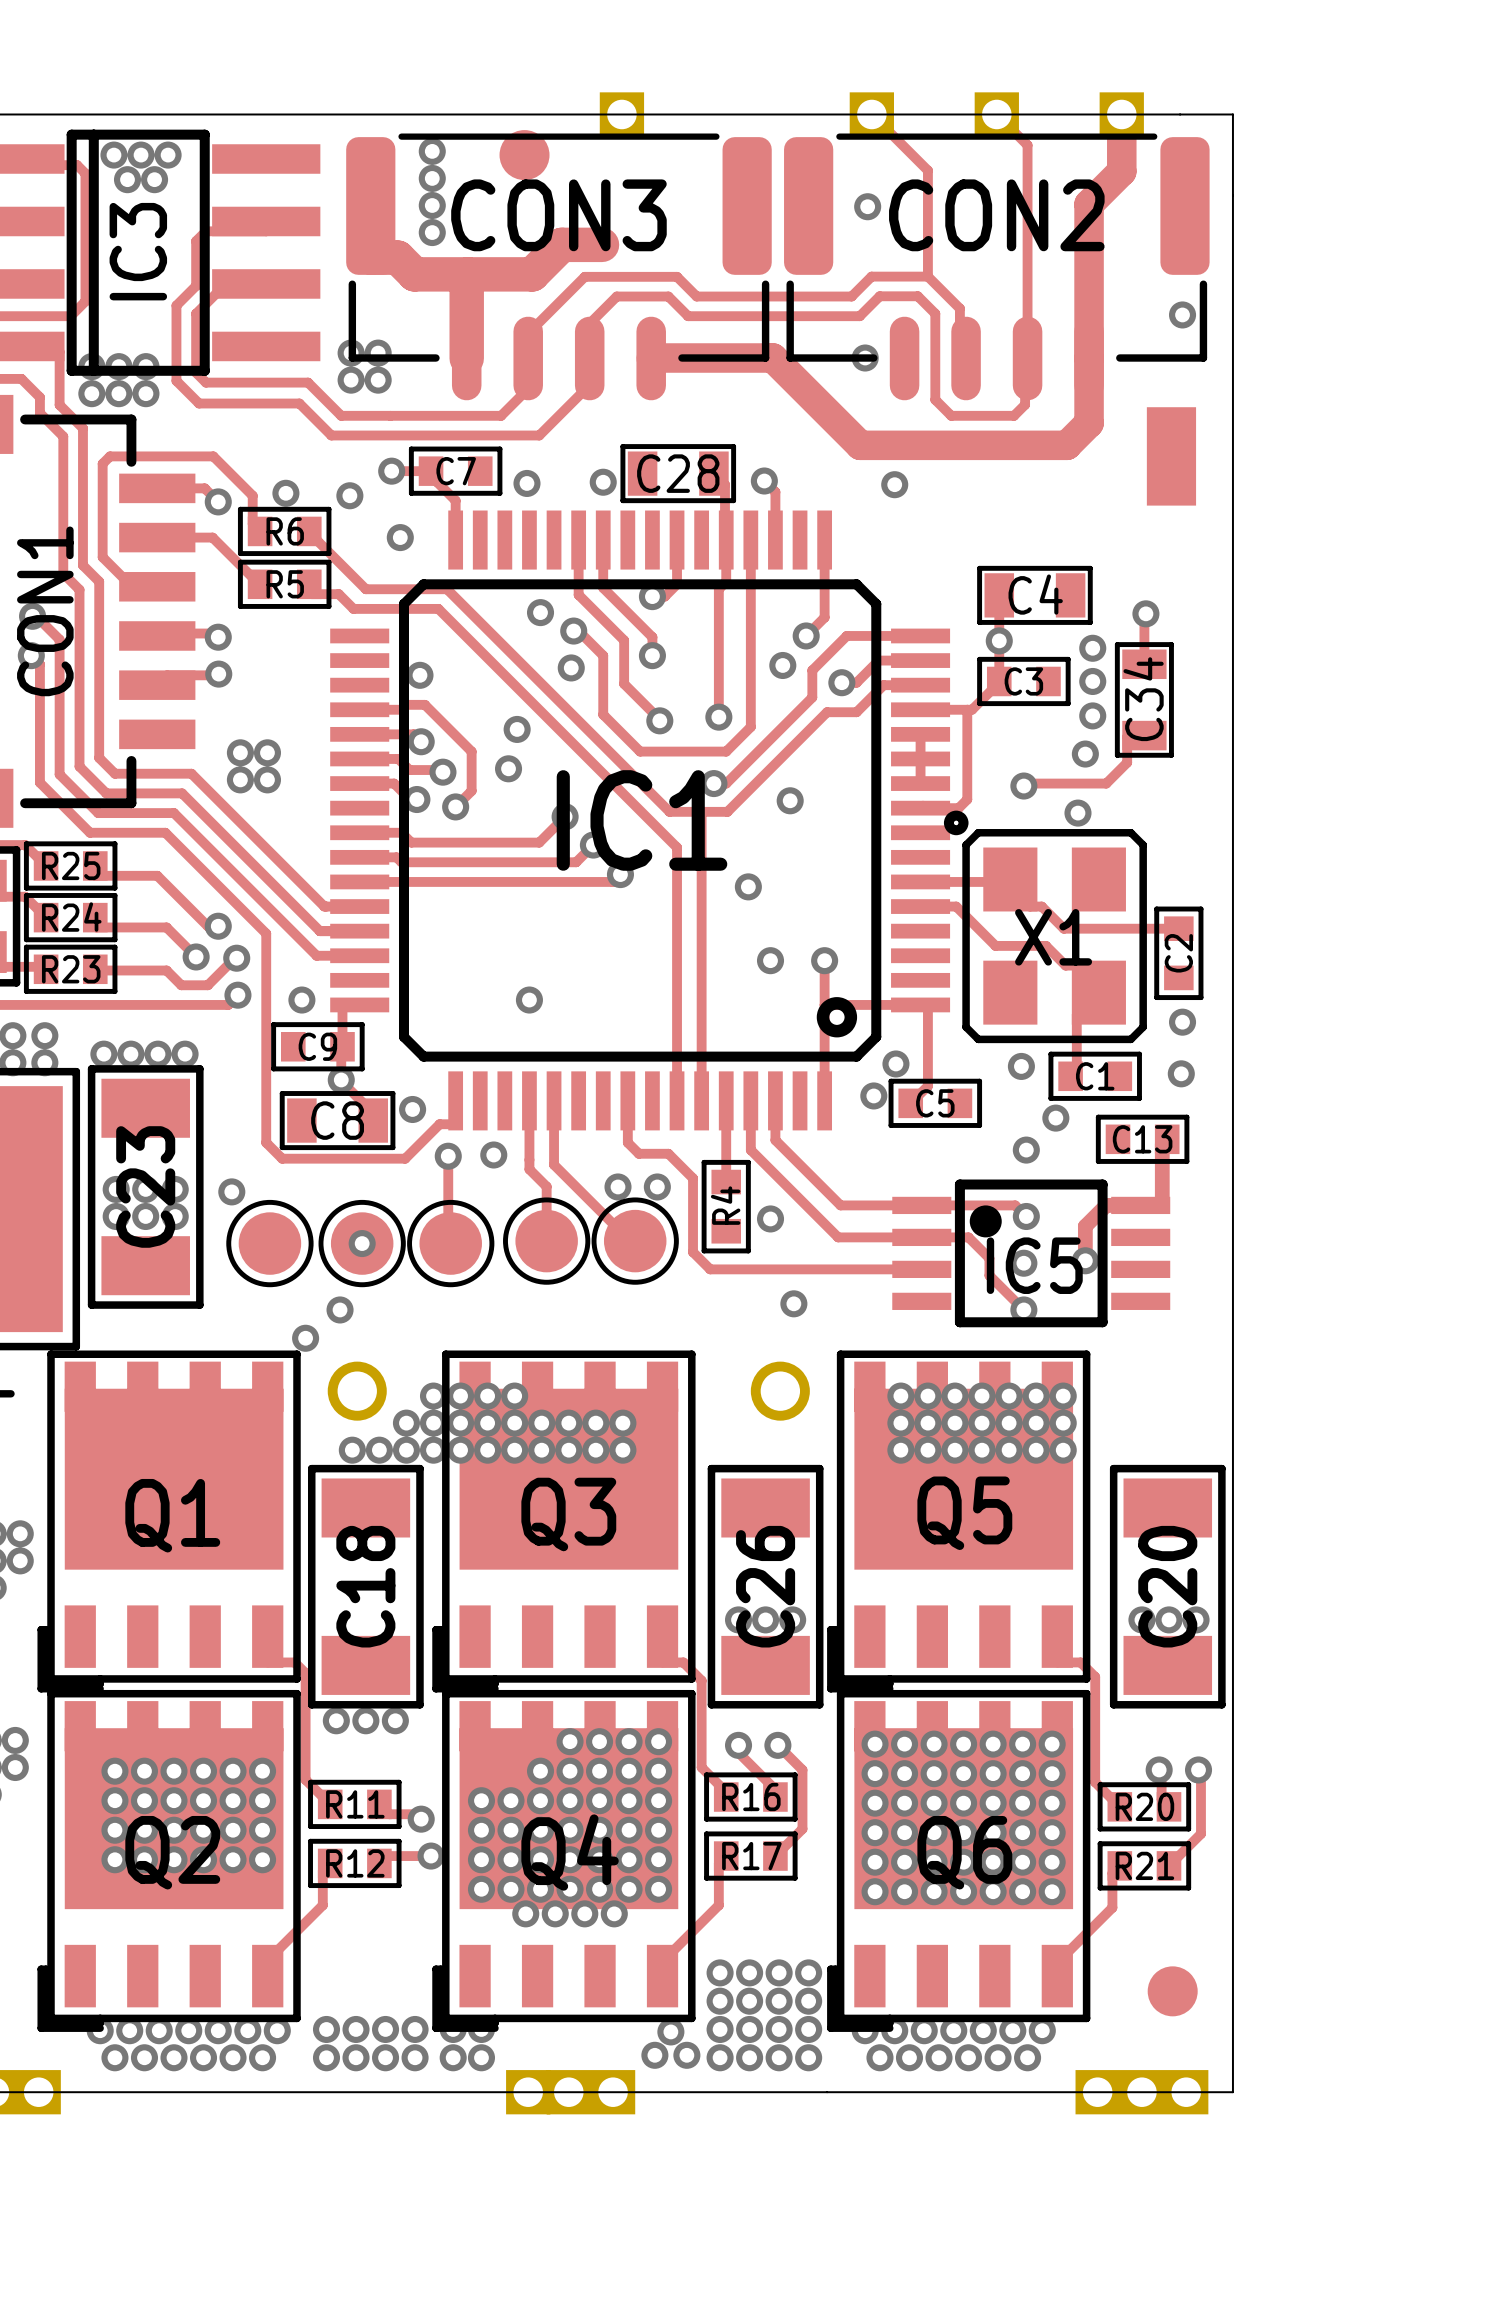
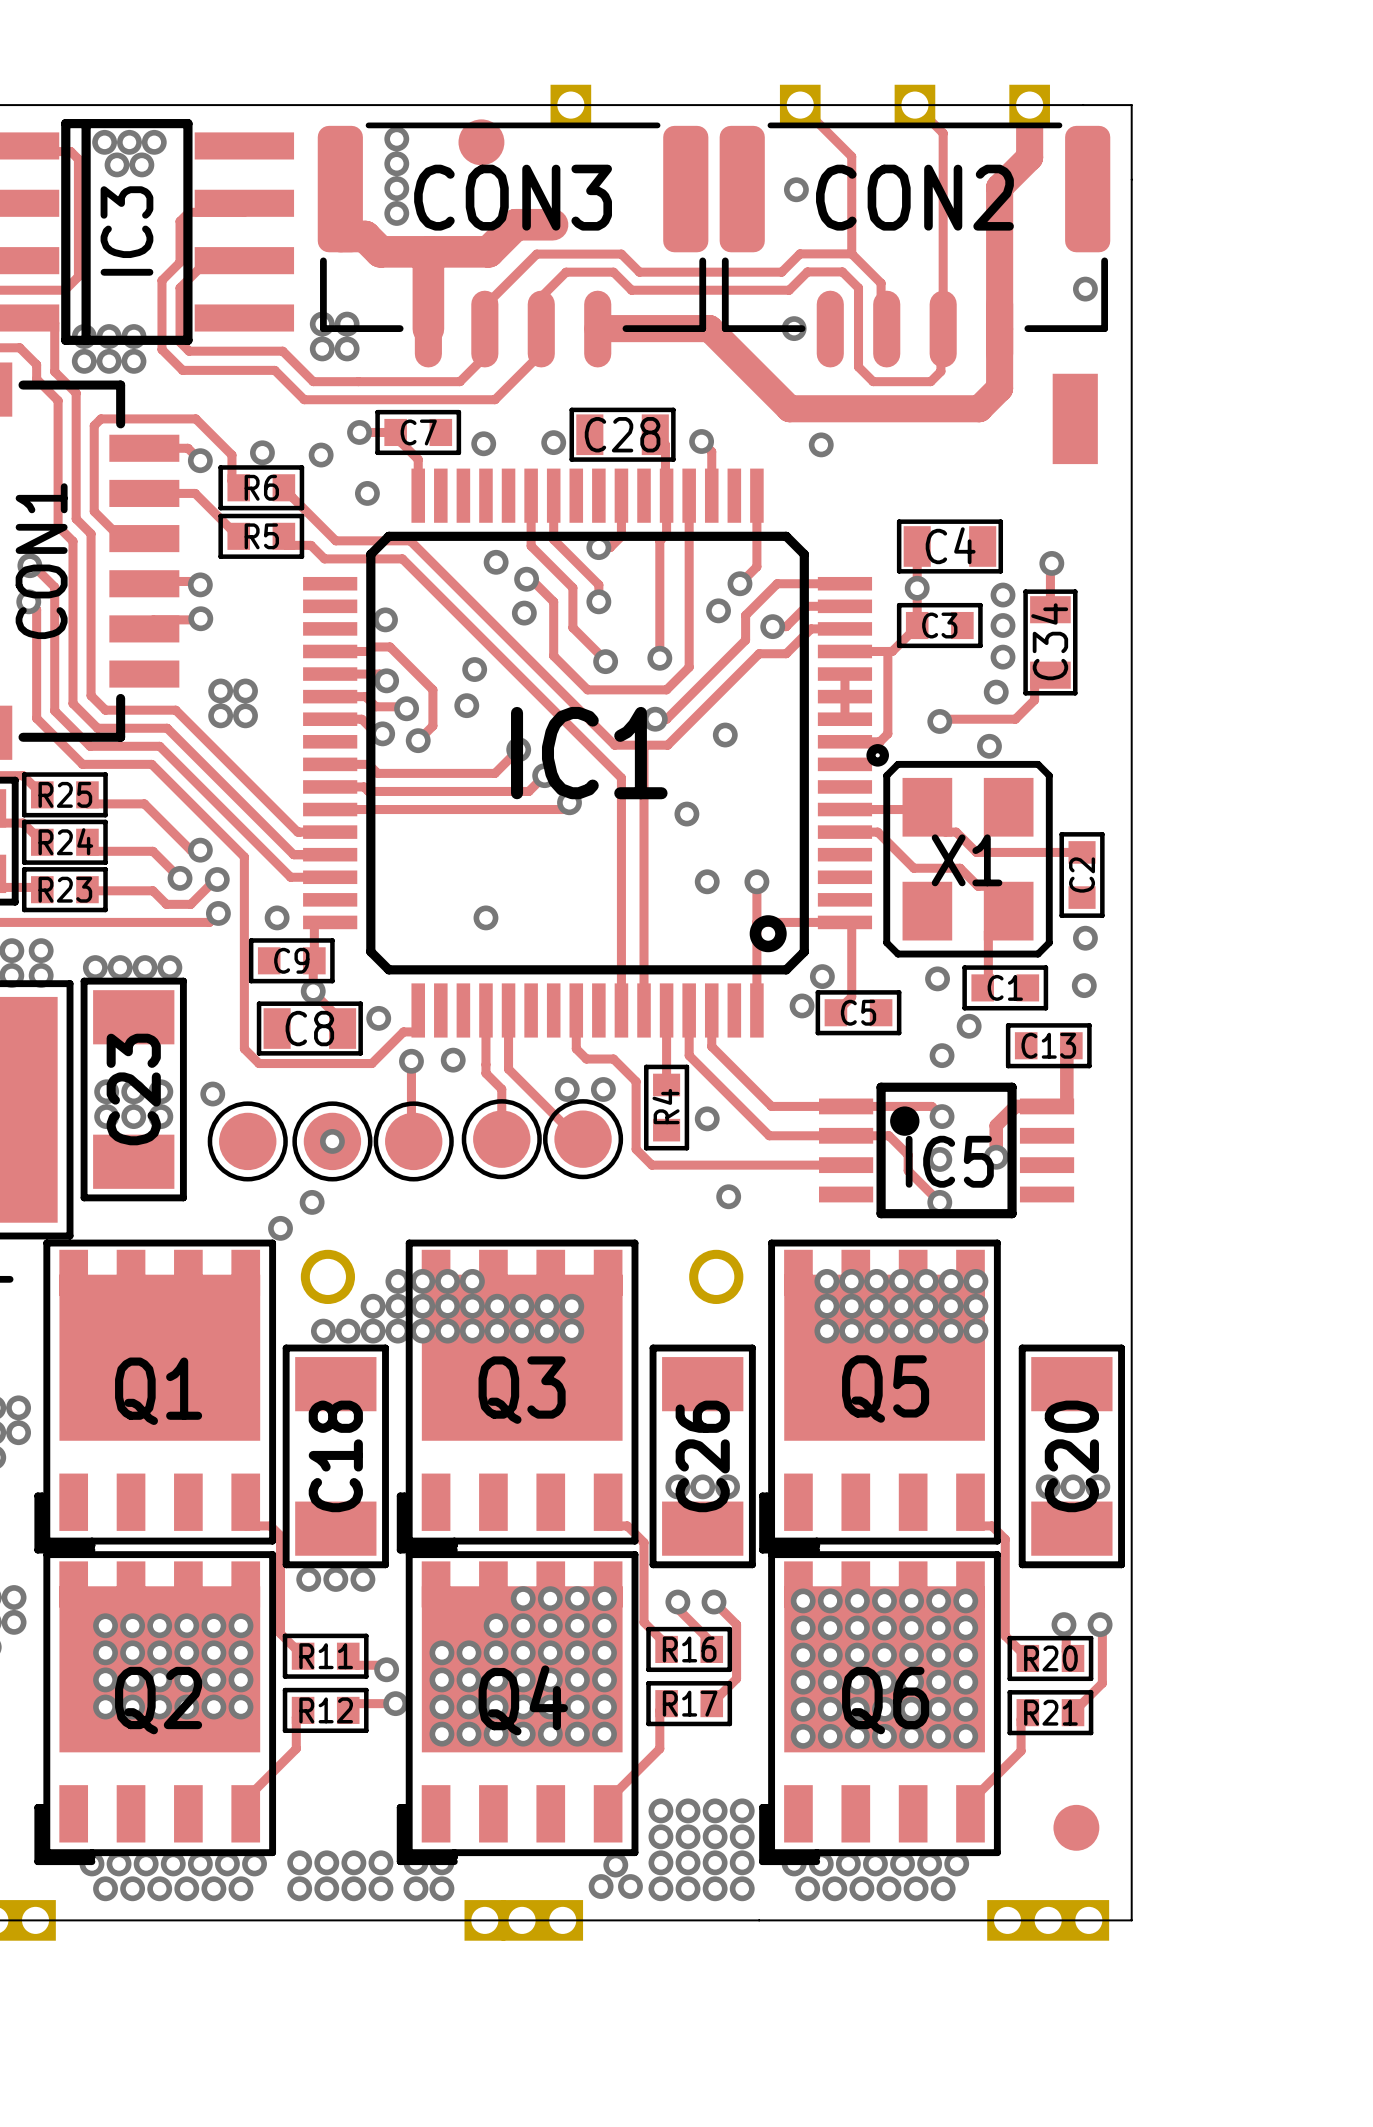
via: (525, 1913) -> none
via: (555, 1913) -> none
via: (584, 1913) -> none
via: (614, 1913) -> none

